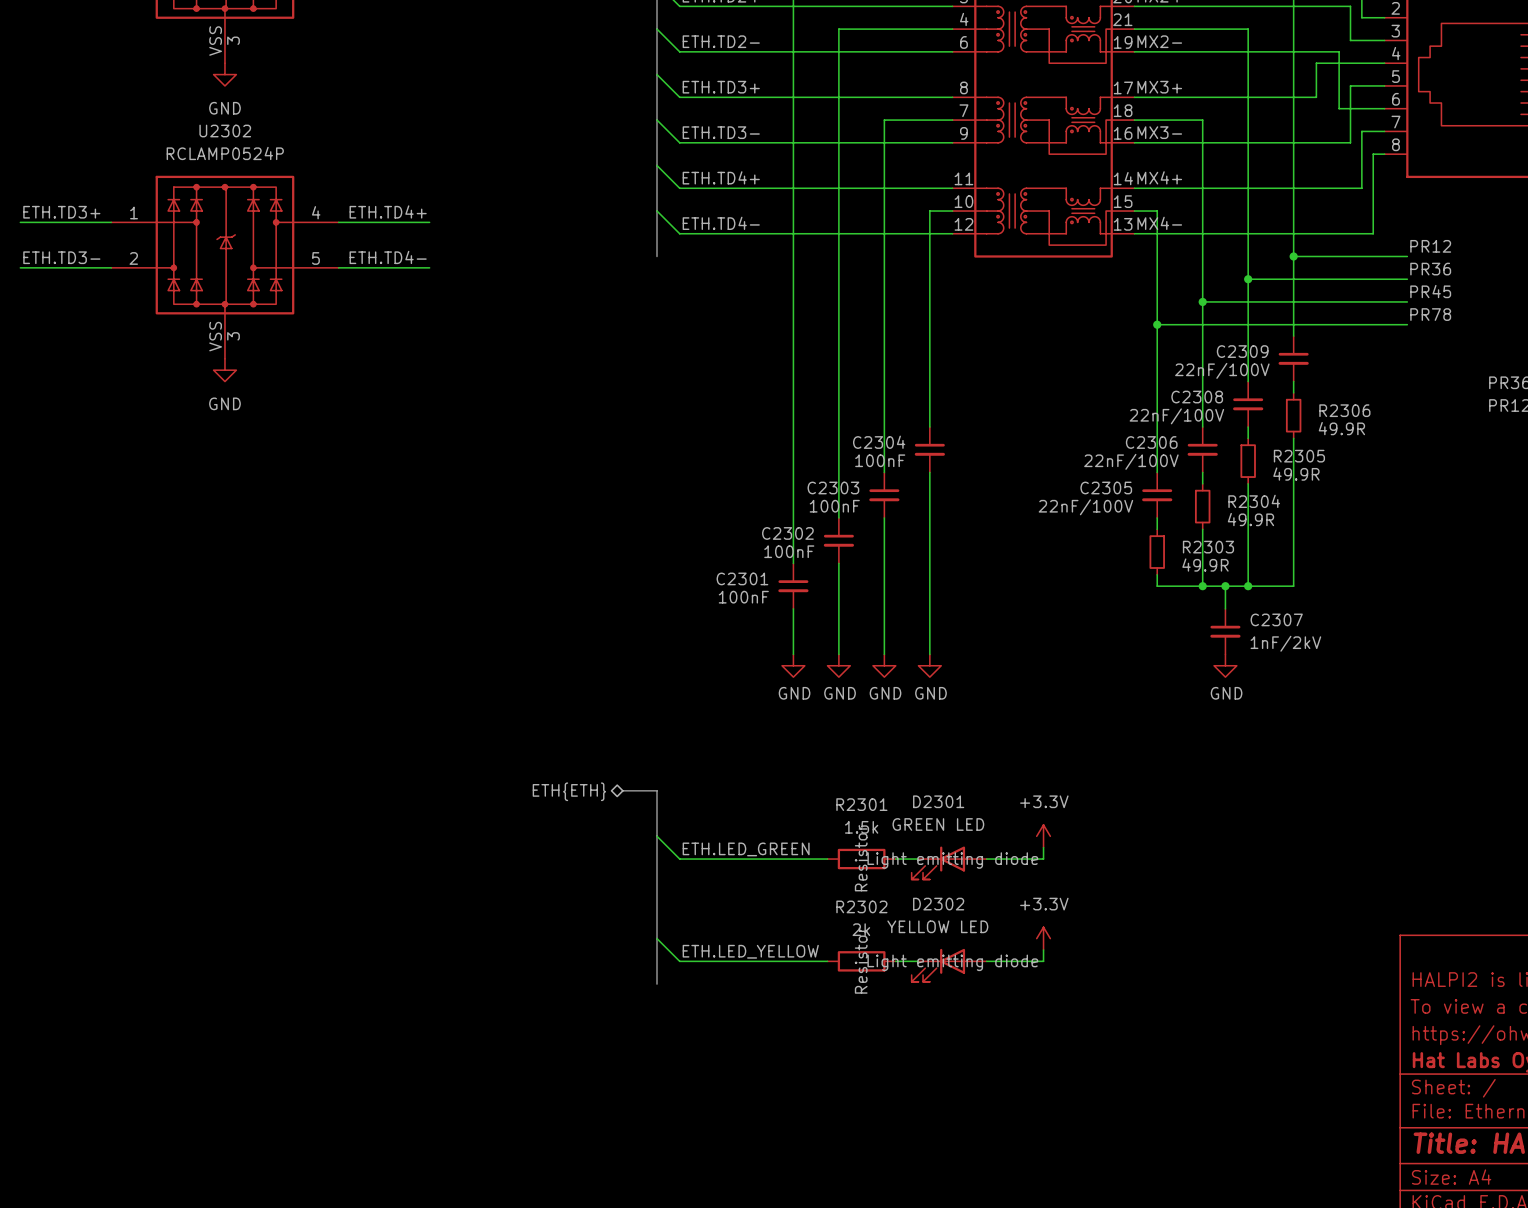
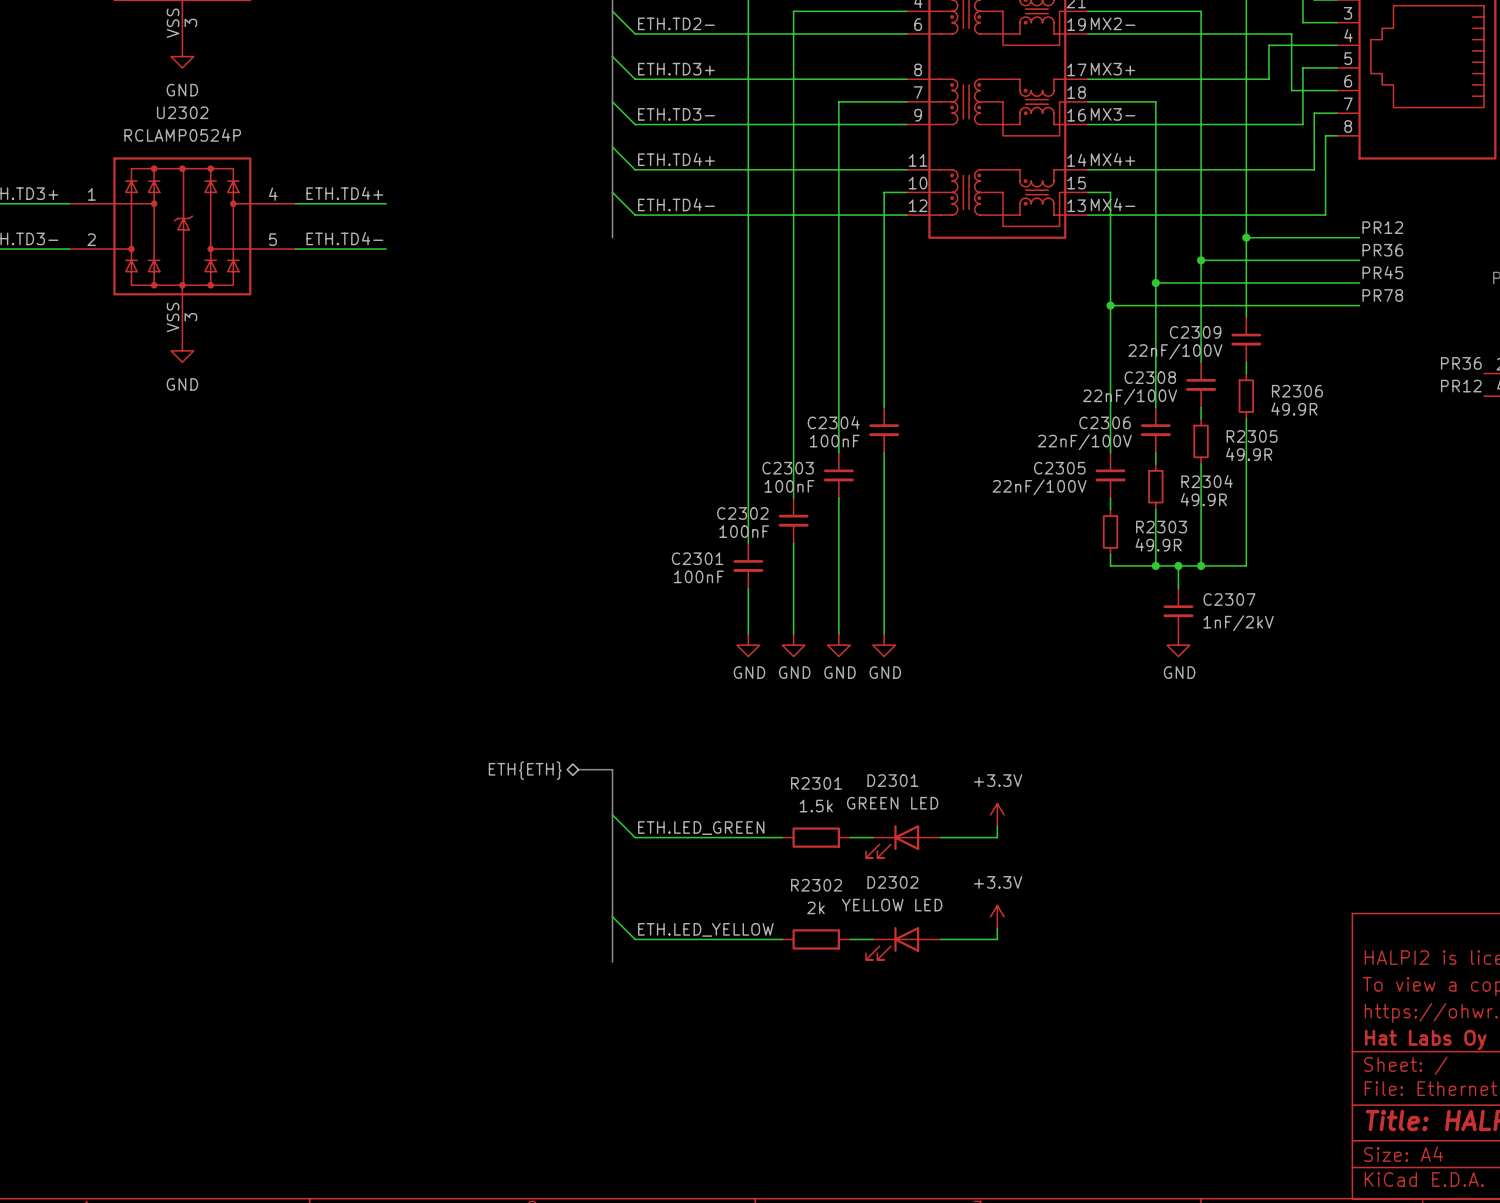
R2301 text: Resistor (861, 858) -> none
D2301 text: Light emitting diode (952, 860) -> none
R2302 text: Resistor (861, 960) -> none
D2302 text: Light emitting diode (952, 962) -> none

